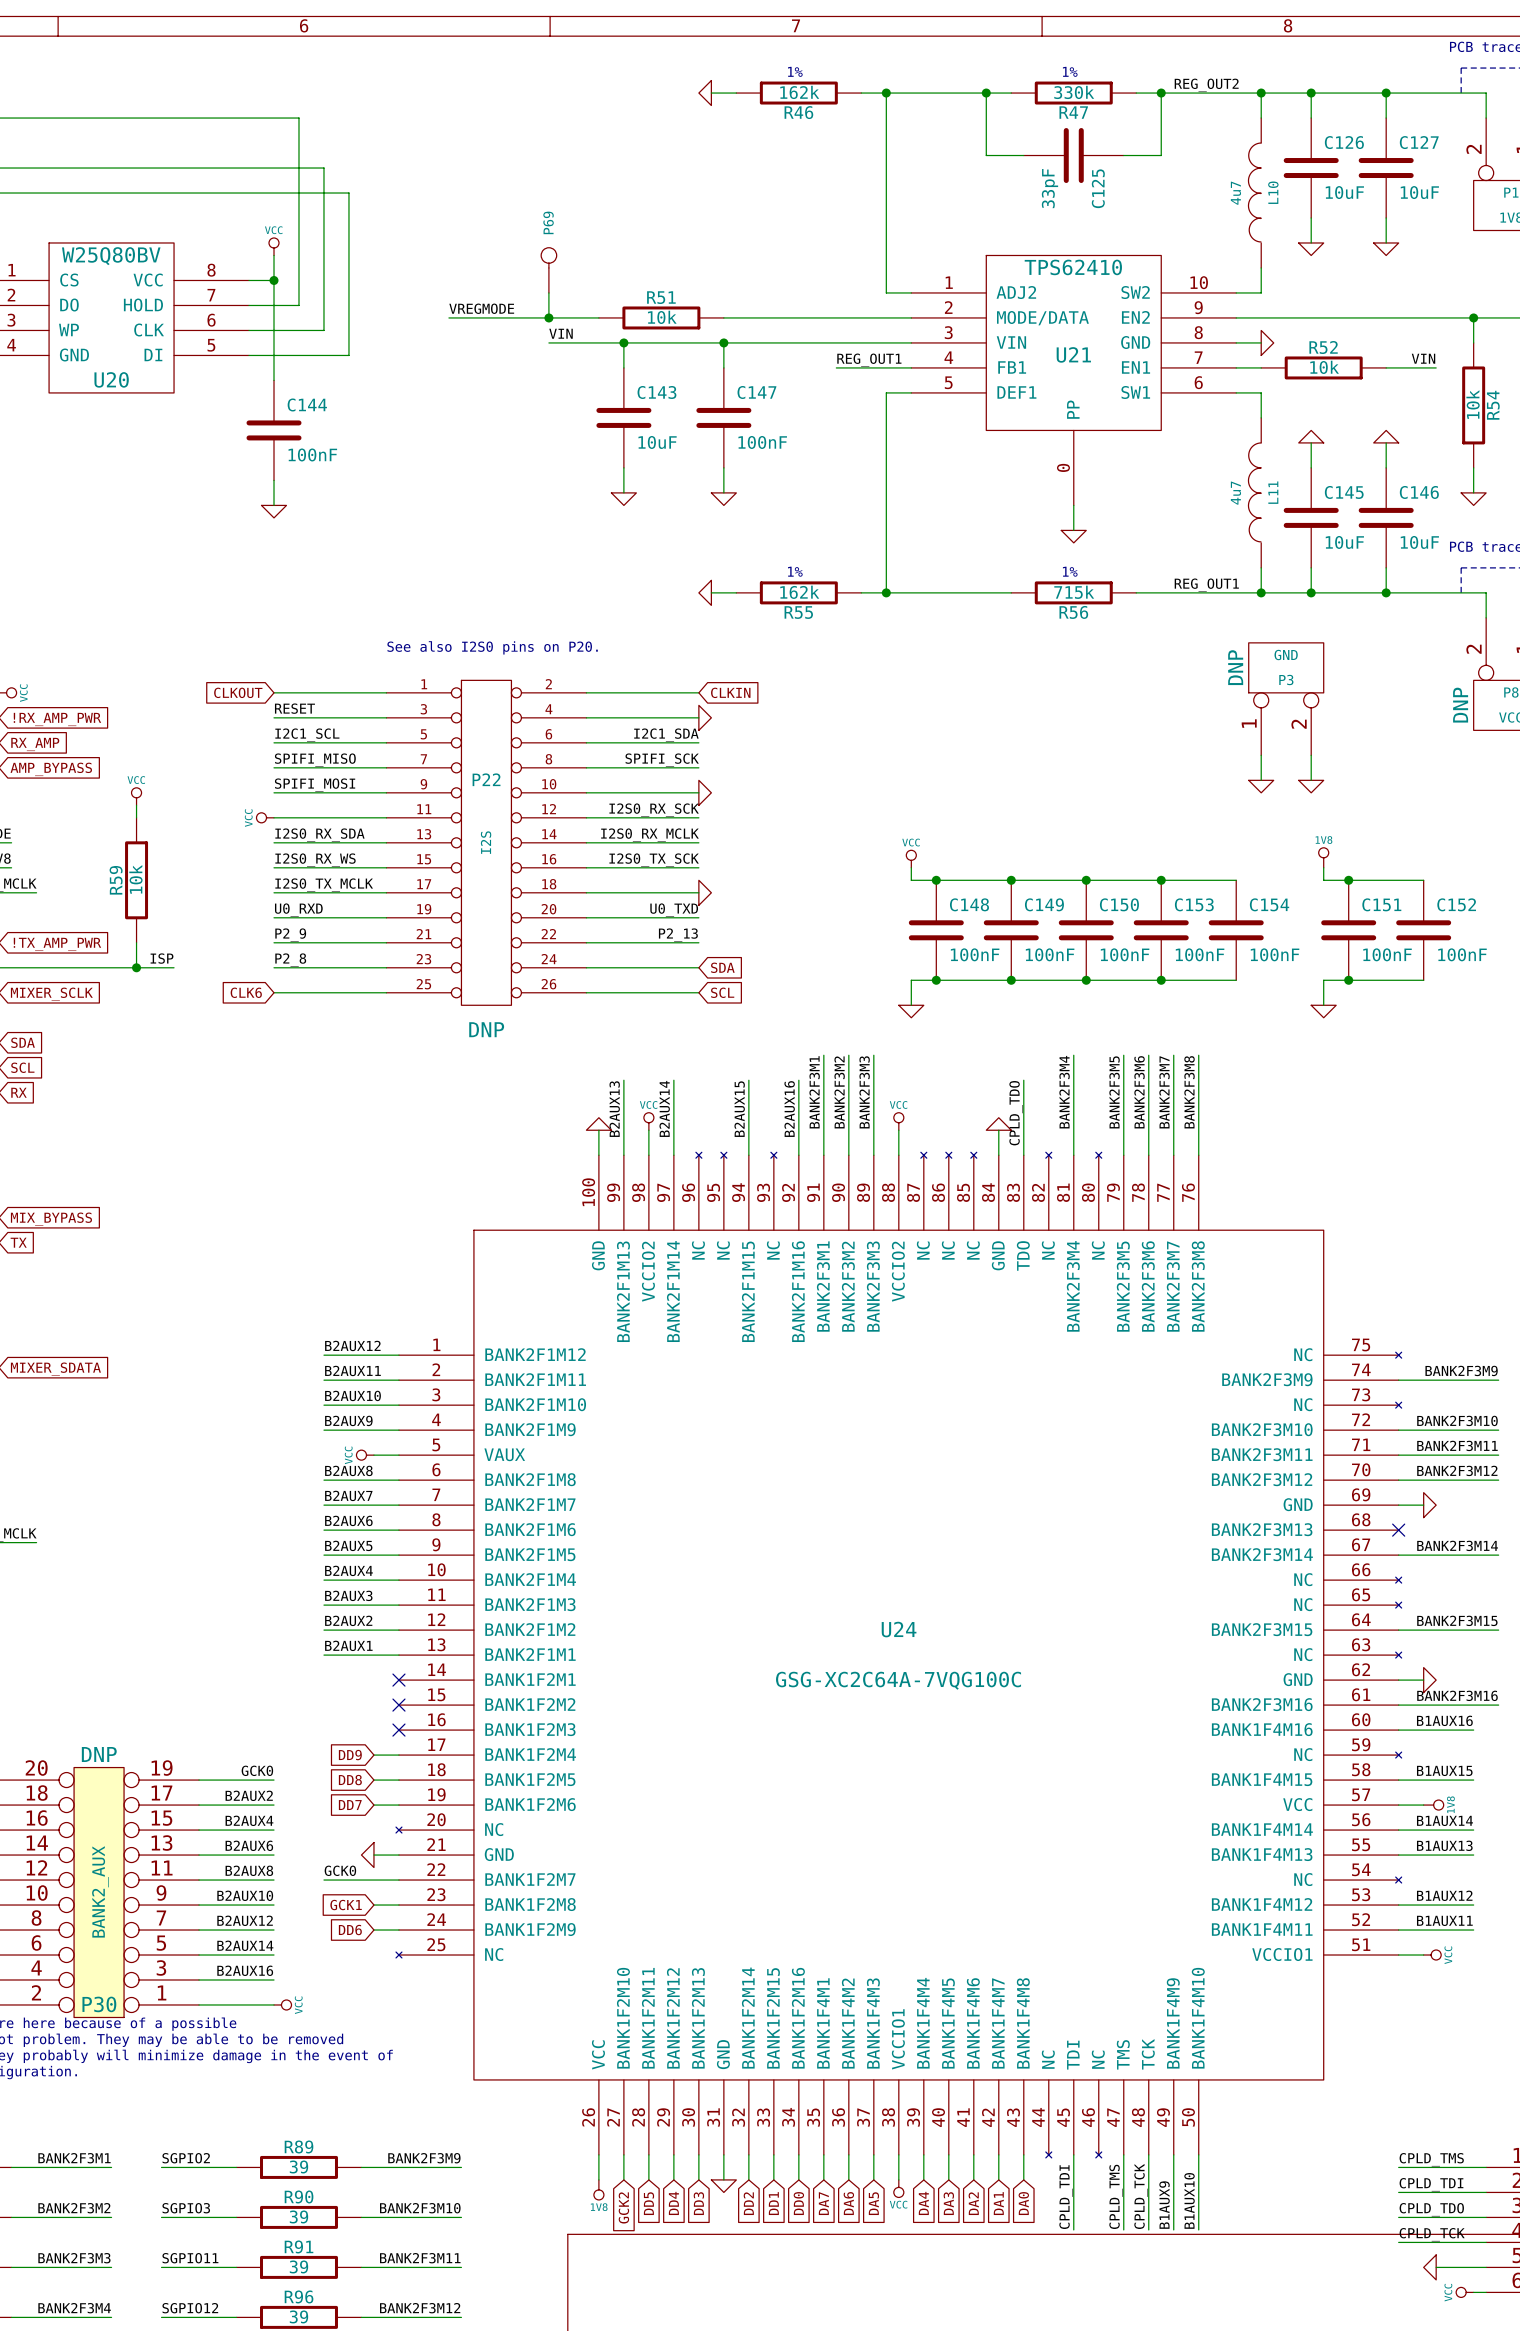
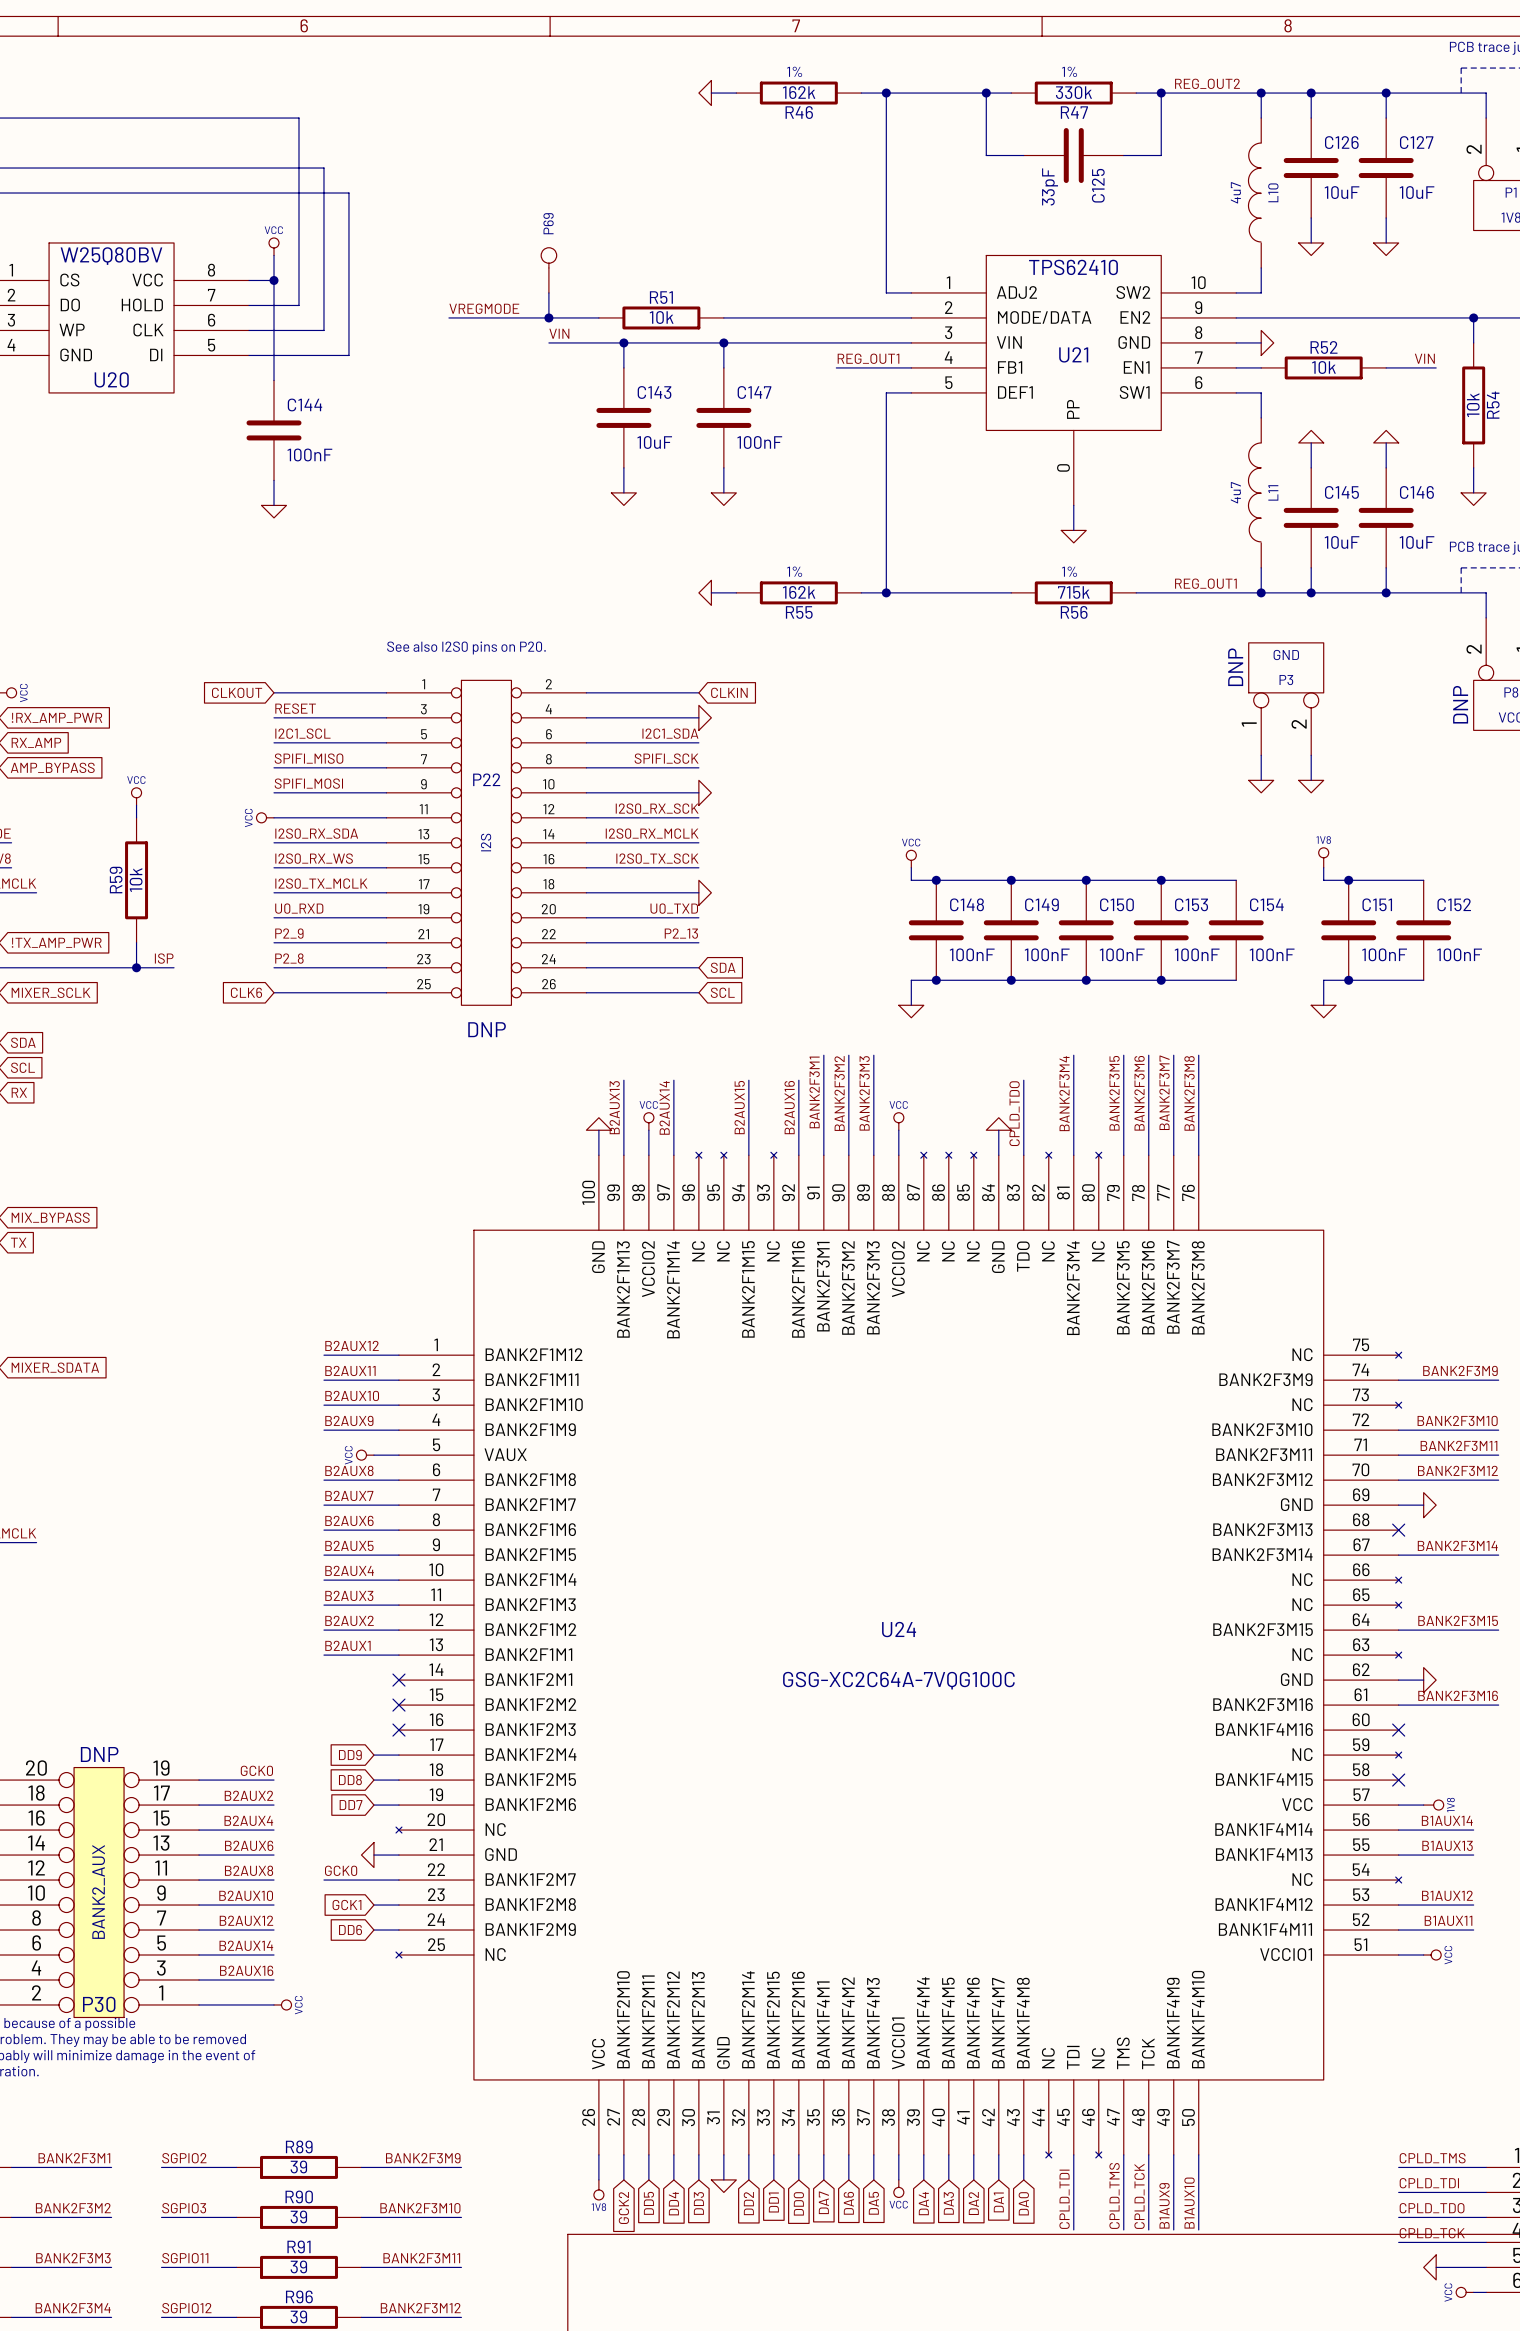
label: B1AUX16 (1444, 1720) -> none
wire: (1398, 1730) (1473, 1730) -> none
no-connect mark: none -> (1398, 1730)
label: B1AUX15 (1444, 1770) -> none
wire: (1398, 1780) (1473, 1780) -> none
no-connect mark: none -> (1398, 1780)

